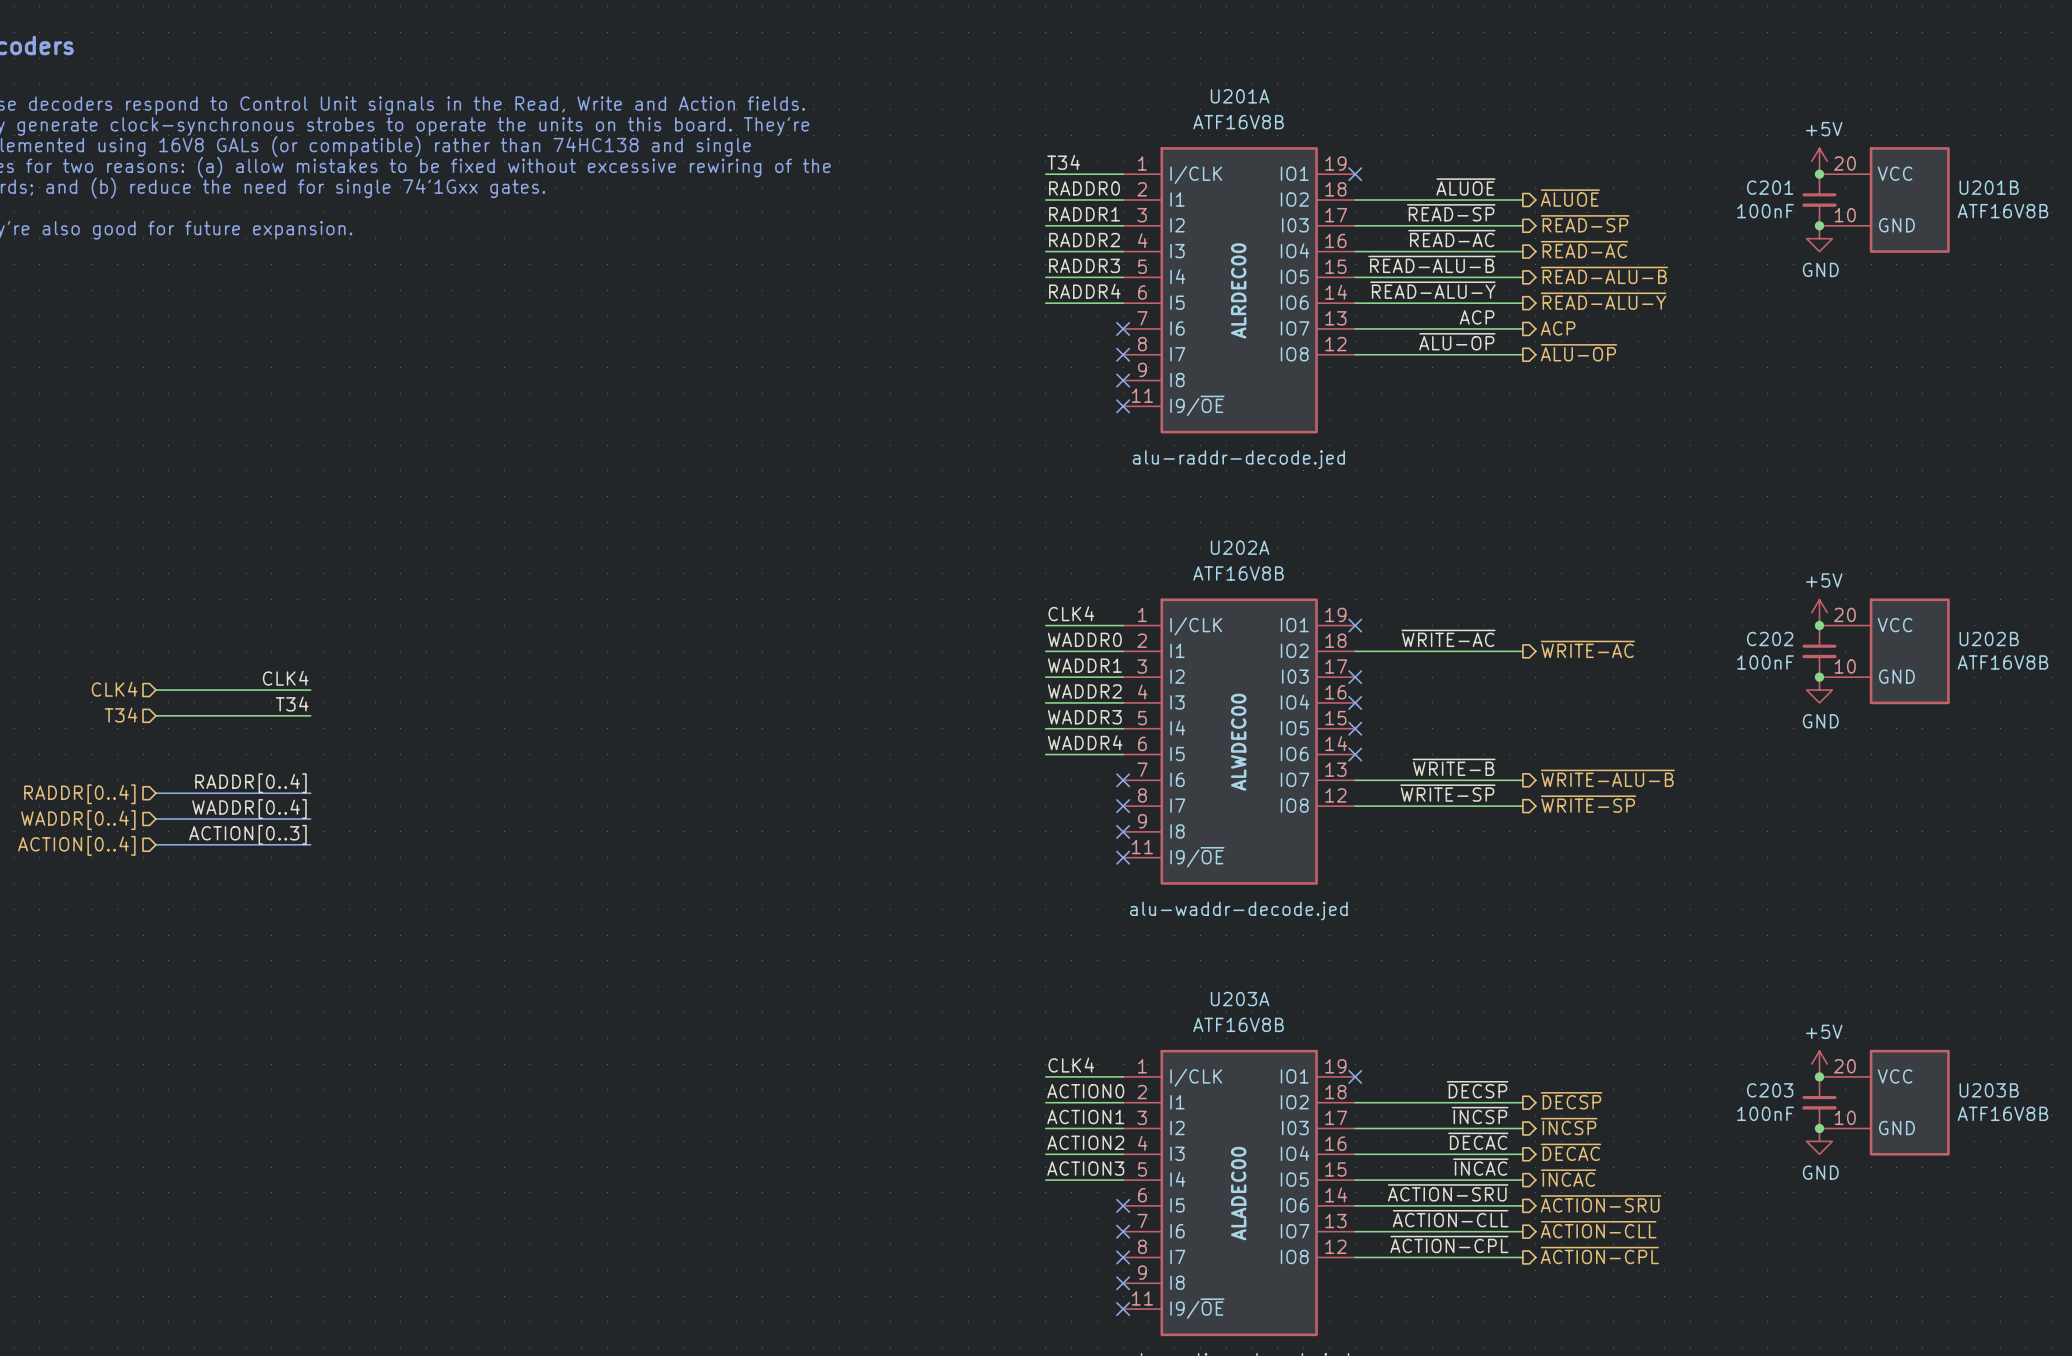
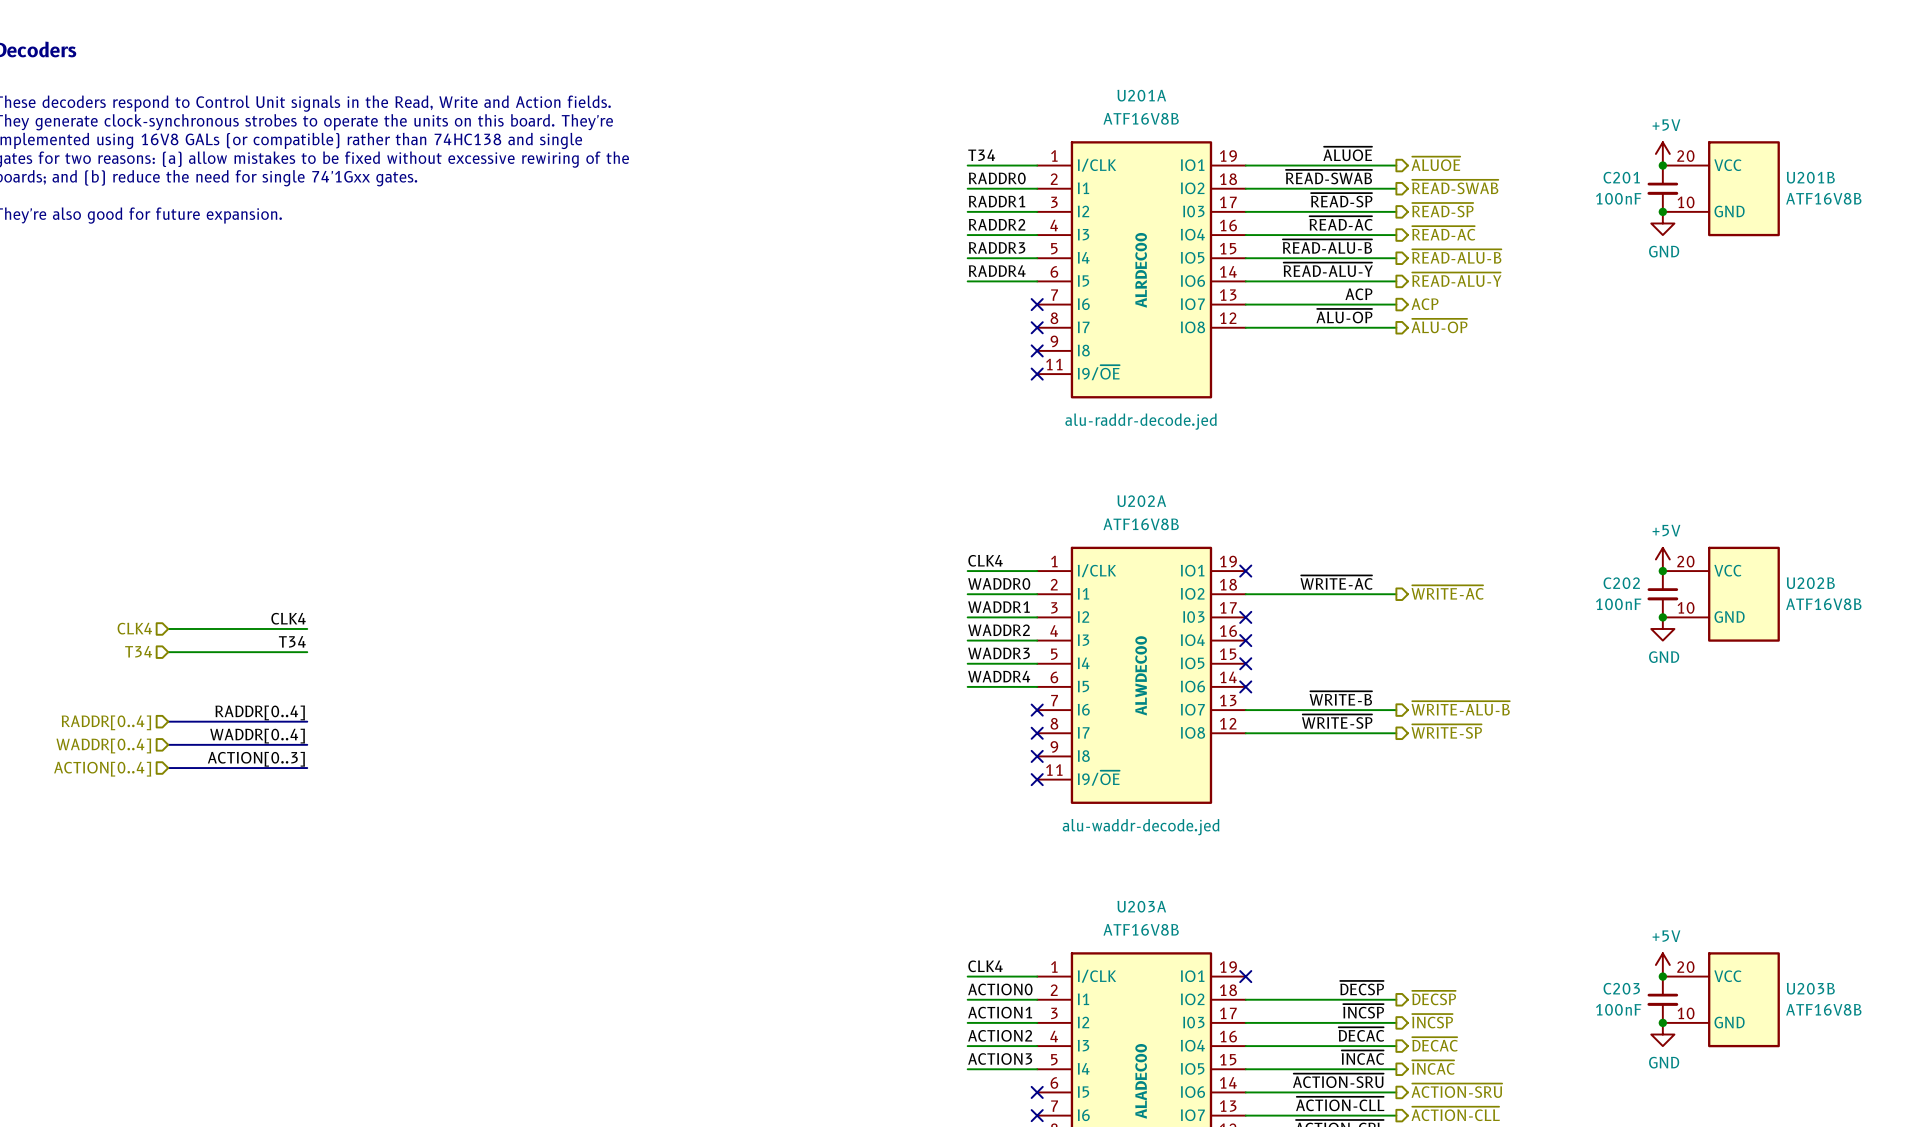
label: none -> ~{ALUOE} (1347, 153)
hierarchical label: none -> ~{ALUOE} (1435, 163)
wire: none -> (1245, 165) (1396, 165)
no-connect mark: (1355, 174) -> none
label: ~{ALUOE} (1465, 187) -> ~{READ-SWAB} (1328, 177)
hierarchical label: ~{ALUOE} (1570, 198) -> ~{READ-SWAB} (1455, 187)

